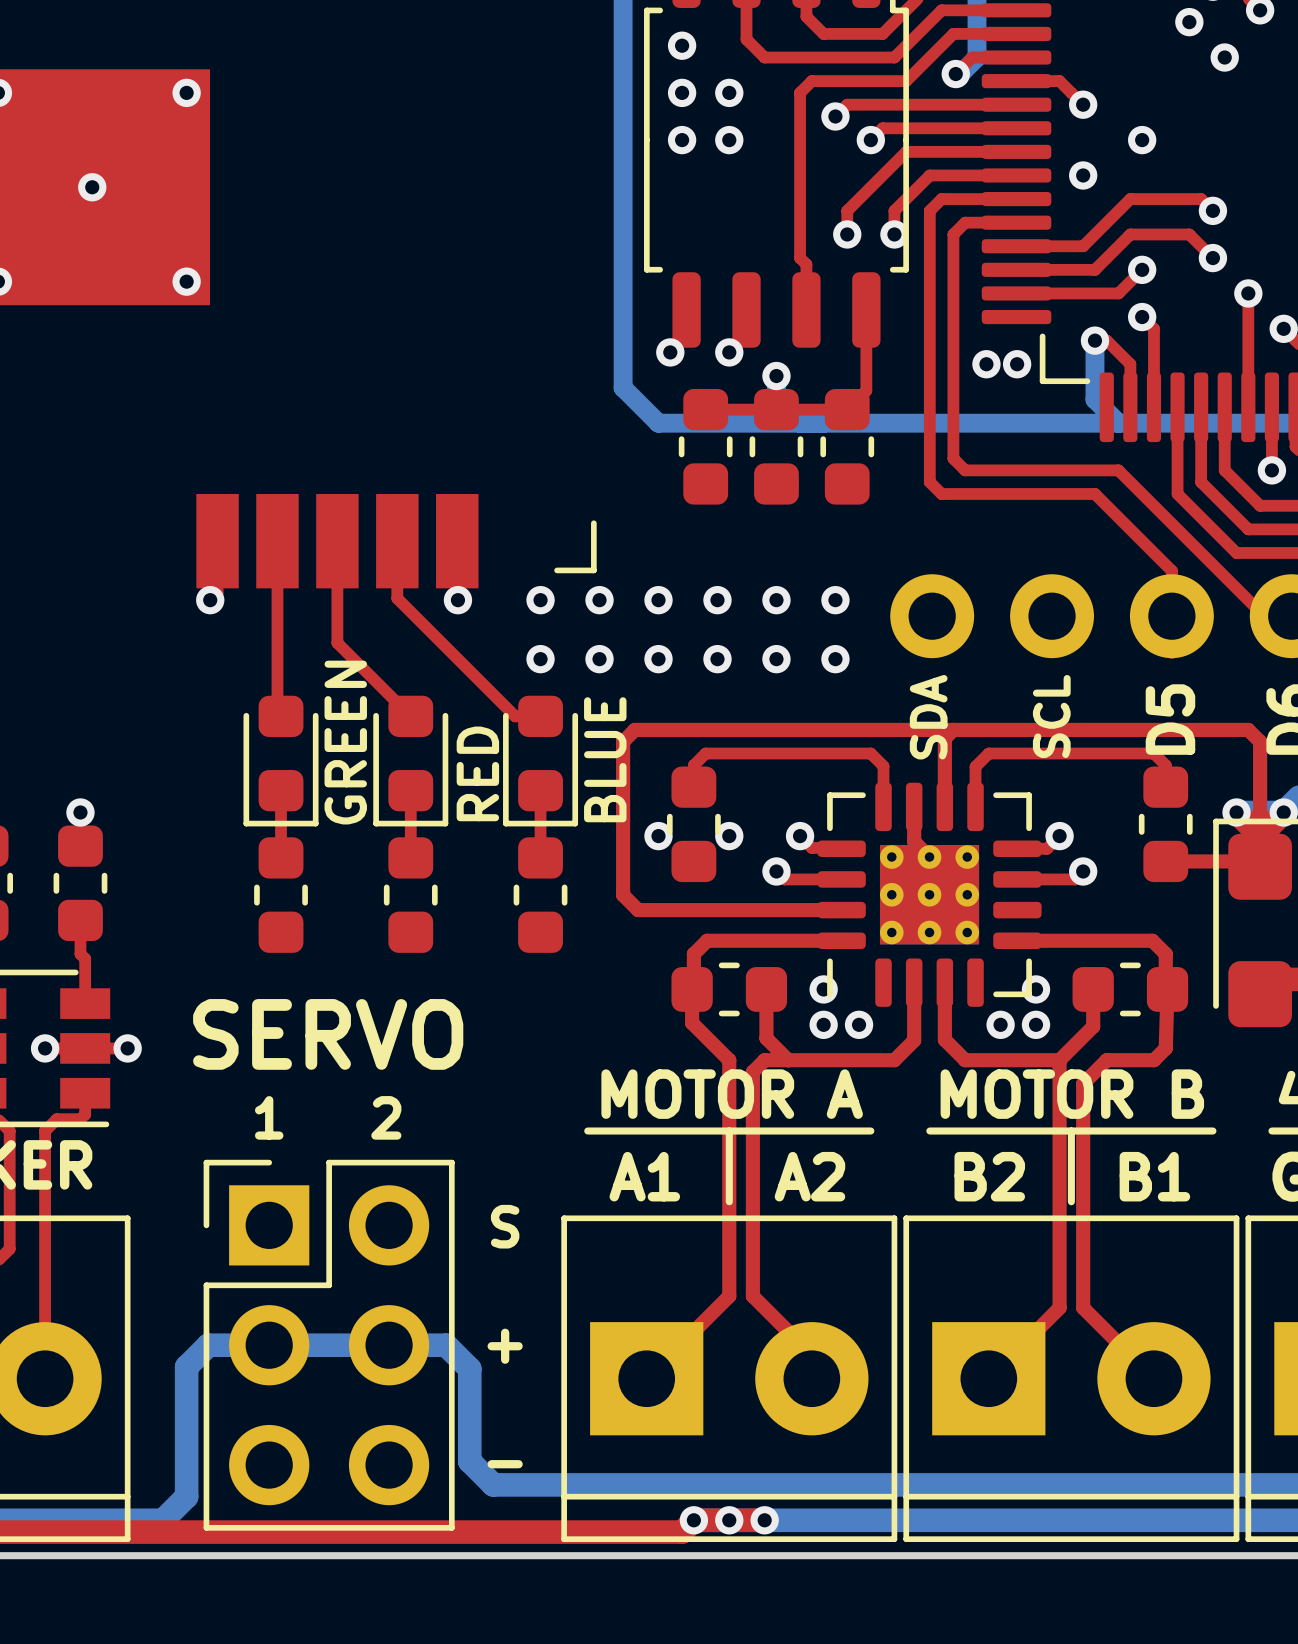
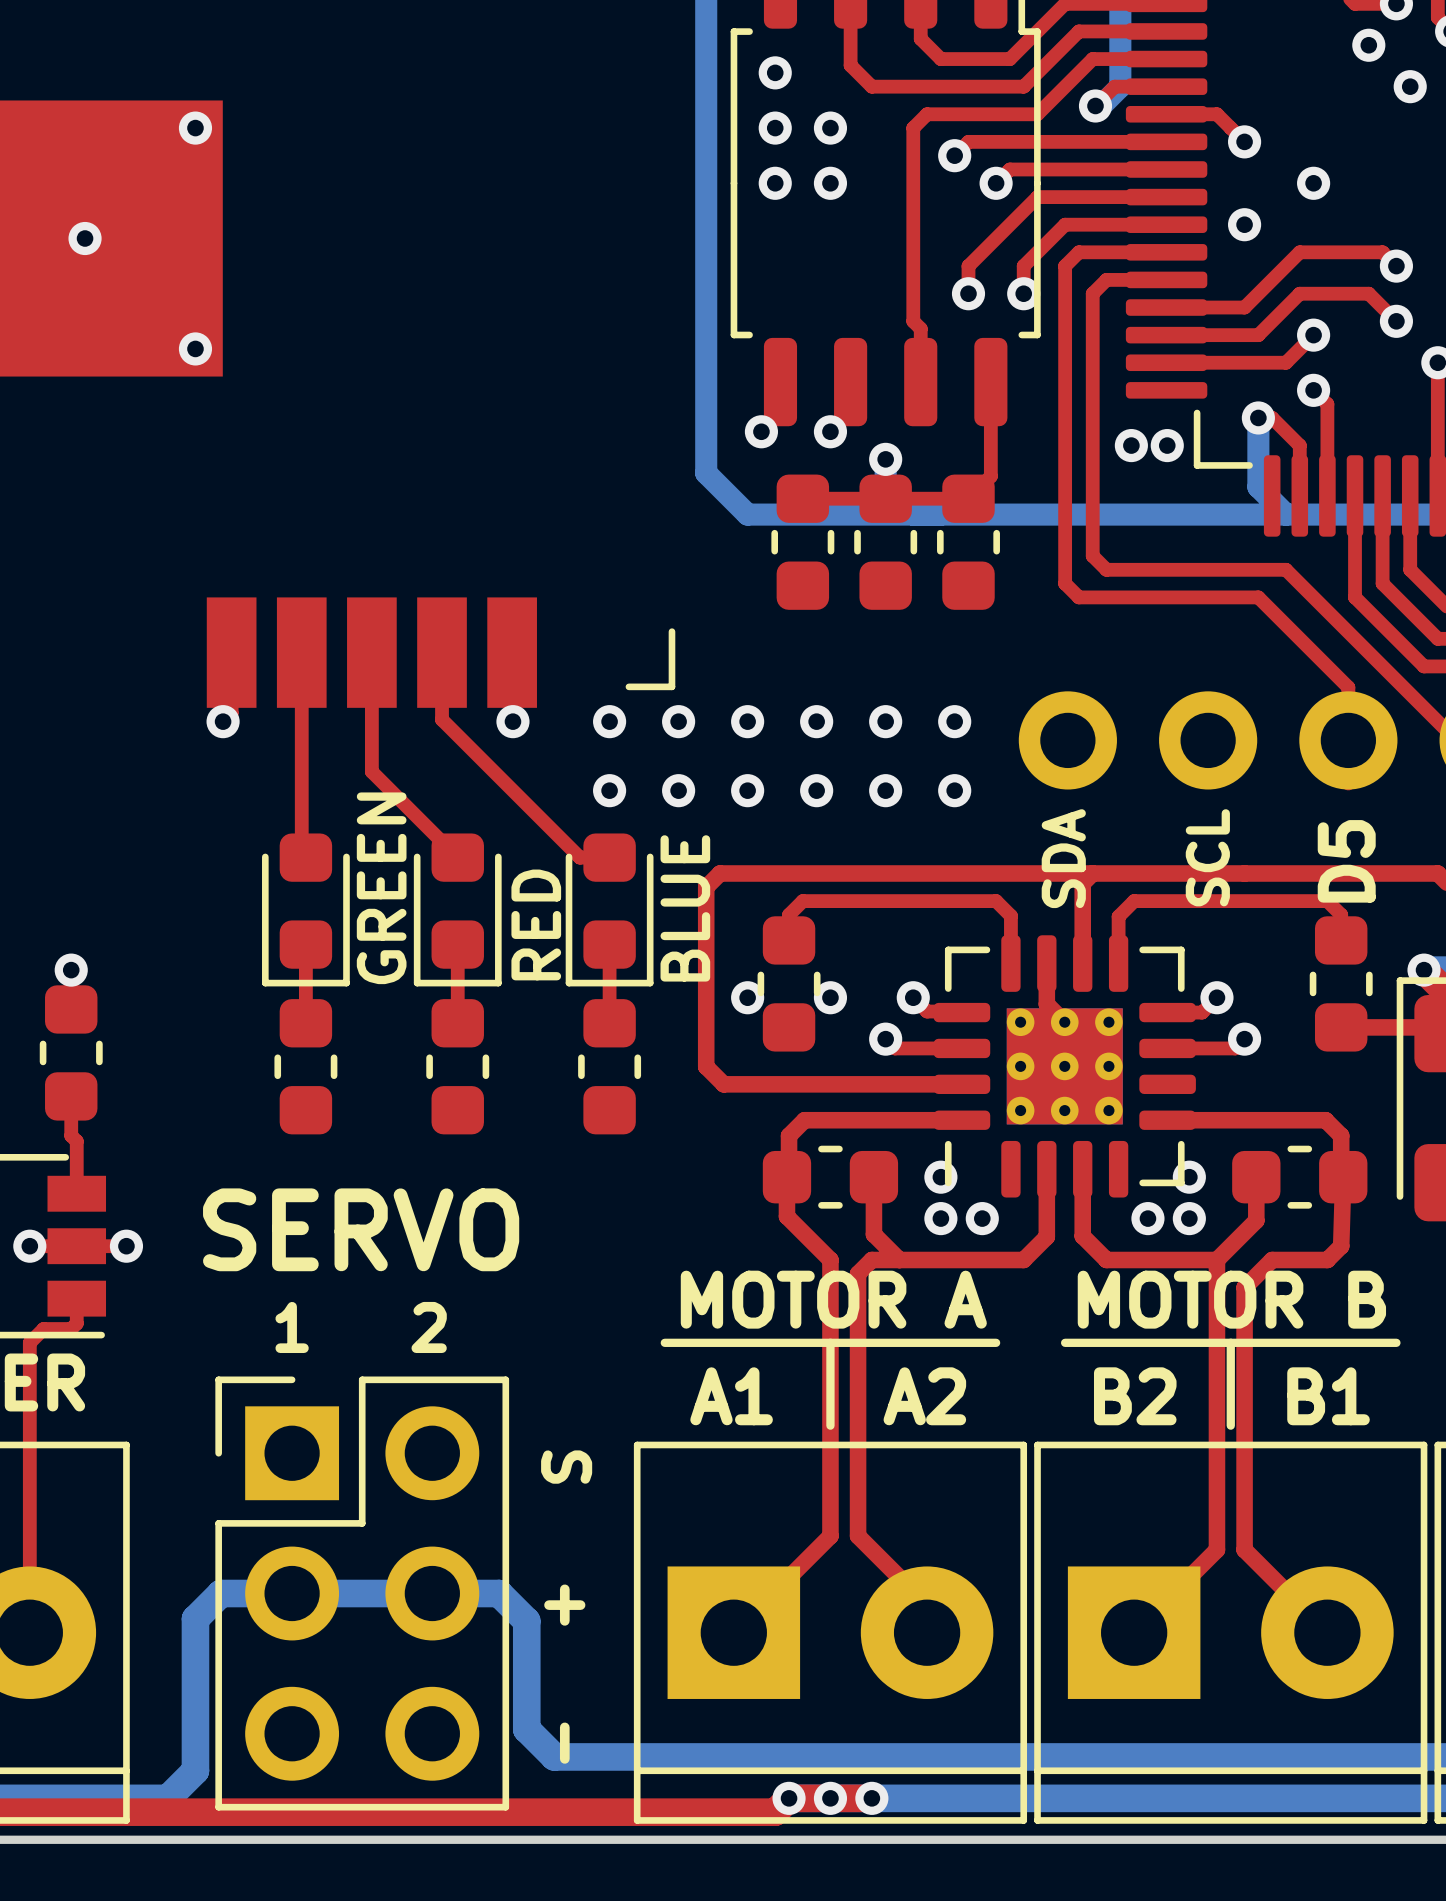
text rotation: 0° (505, 1226) -> 90° clockwise (566, 1467)
text rotation: 0° (505, 1346) -> 90° clockwise (564, 1605)
text rotation: 0° (505, 1464) -> 90° clockwise (564, 1743)

